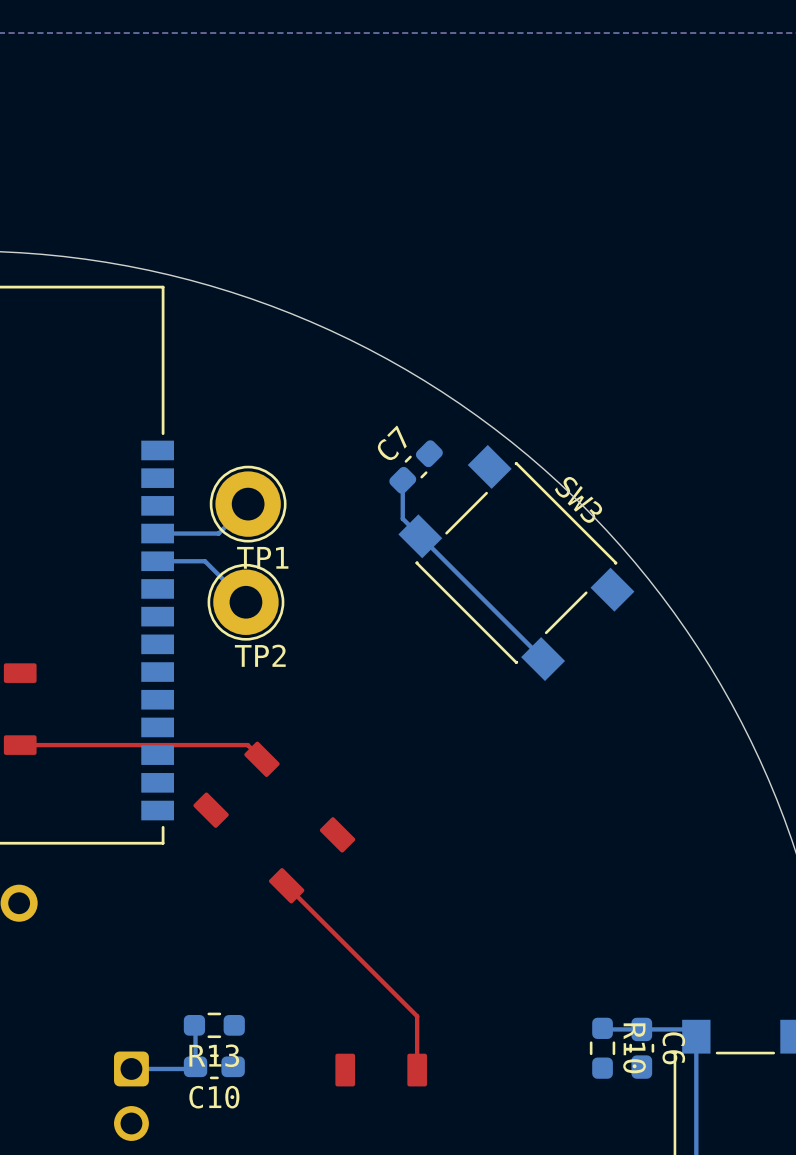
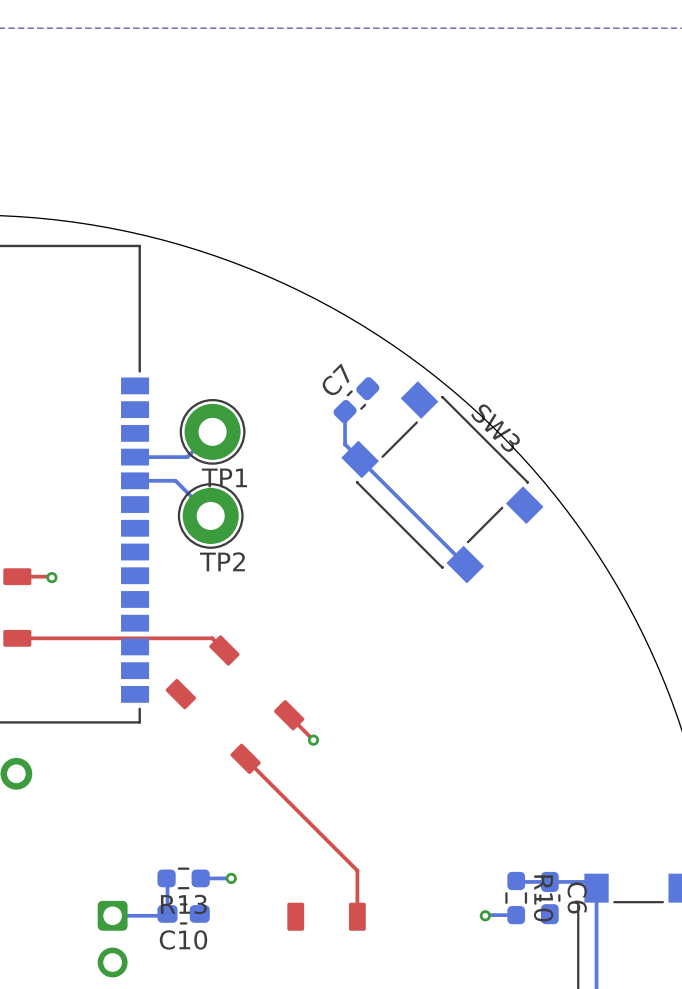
top track: none -> (17, 576) (51, 577)
via: none -> (51, 577)
top track: none -> (289, 715) (313, 740)
via: none -> (313, 740)
bottom track: none -> (231, 878) (200, 878)
via: none -> (231, 878)
via: none -> (485, 915)
bottom track: none -> (516, 915) (485, 915)

